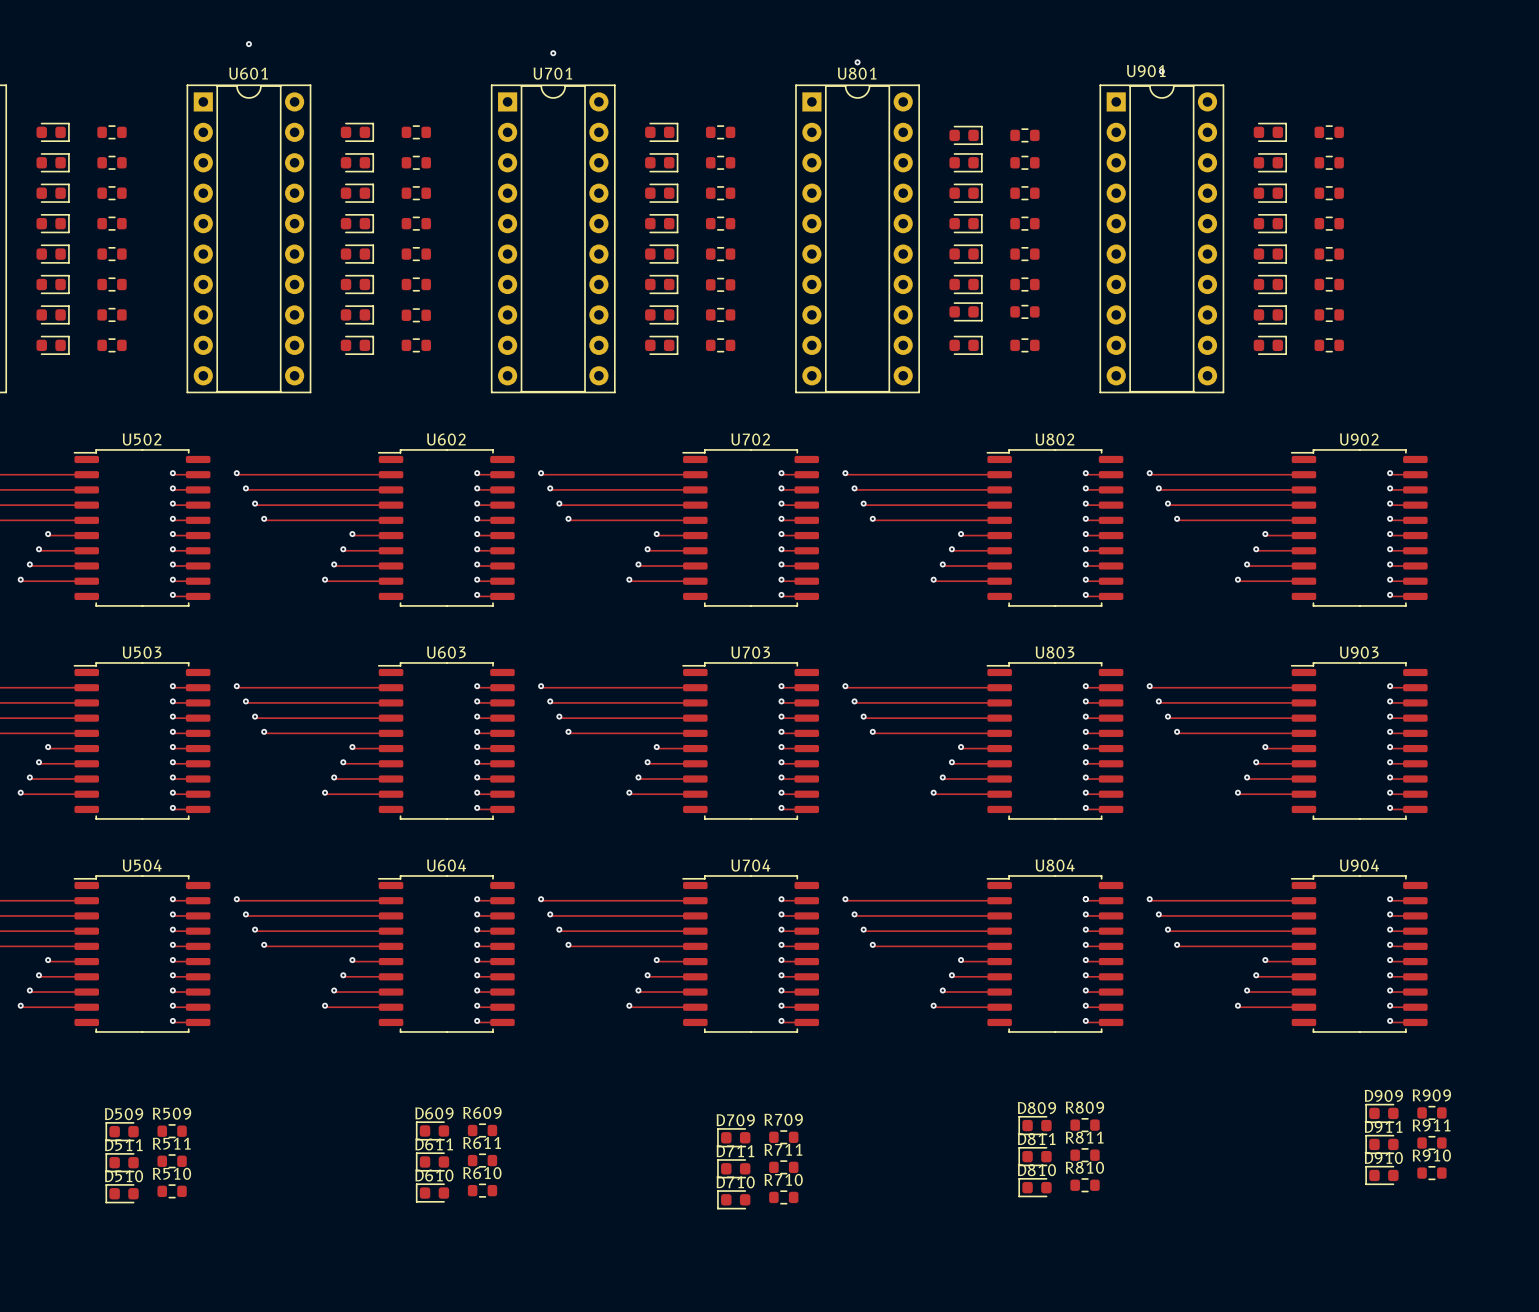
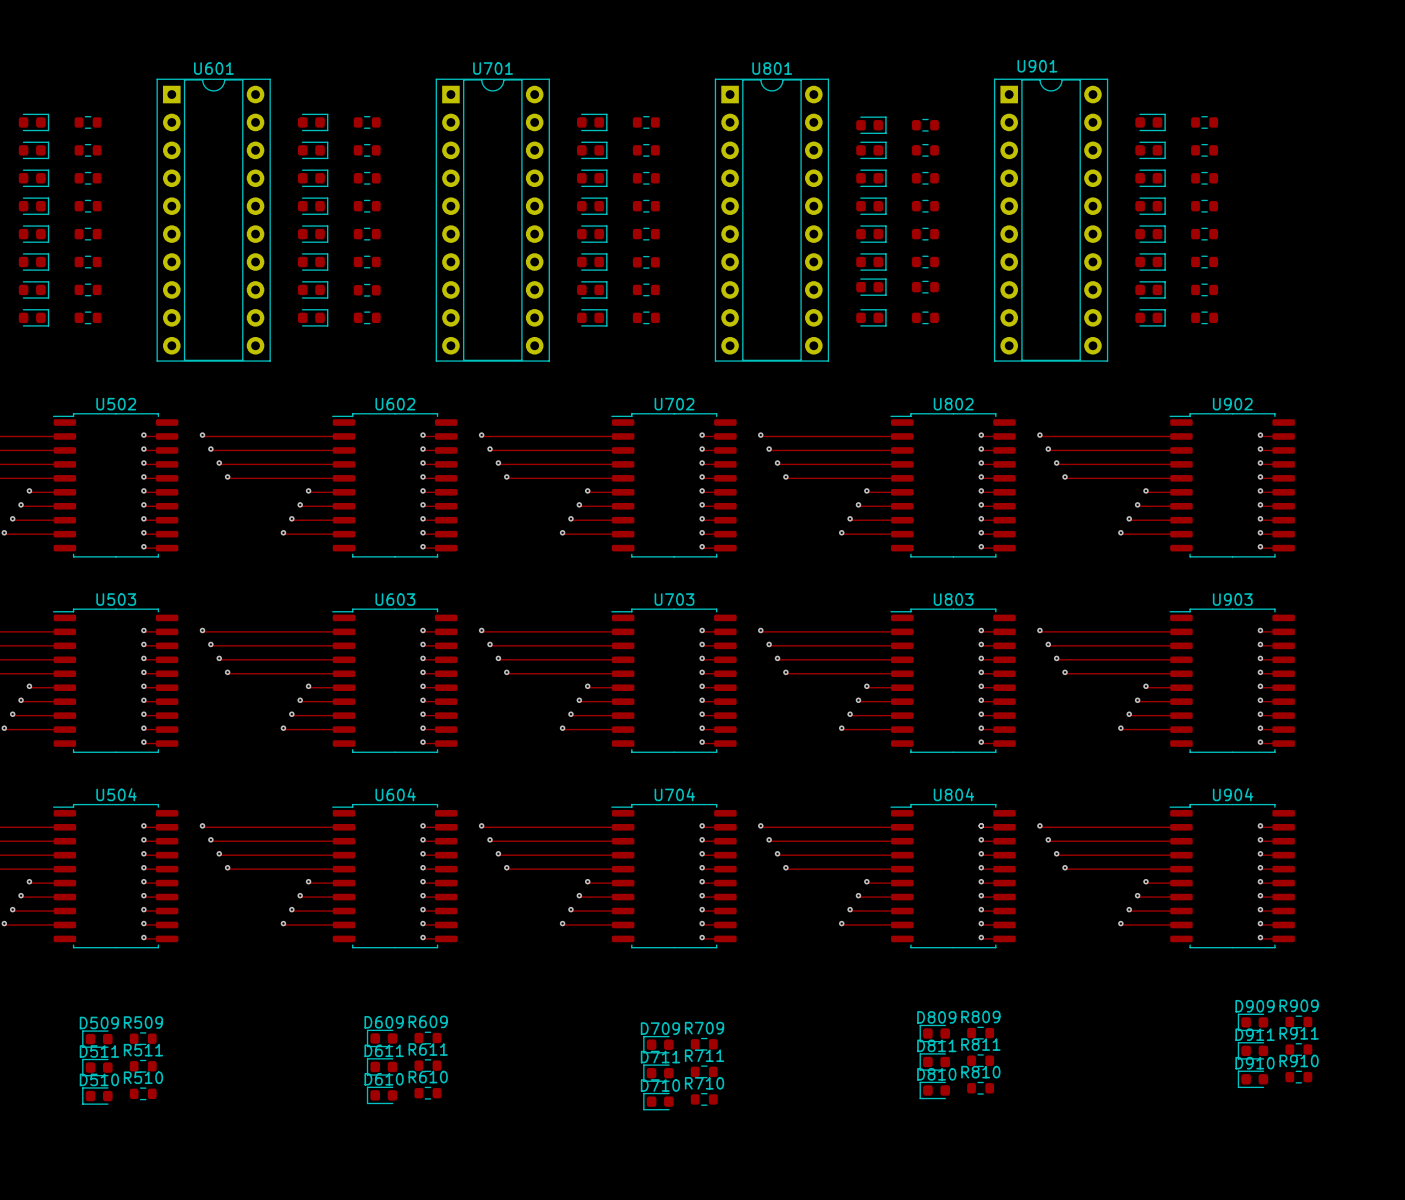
via: (248, 44) -> none
via: (553, 53) -> none
via: (857, 62) -> none
via: (1161, 71) -> none

